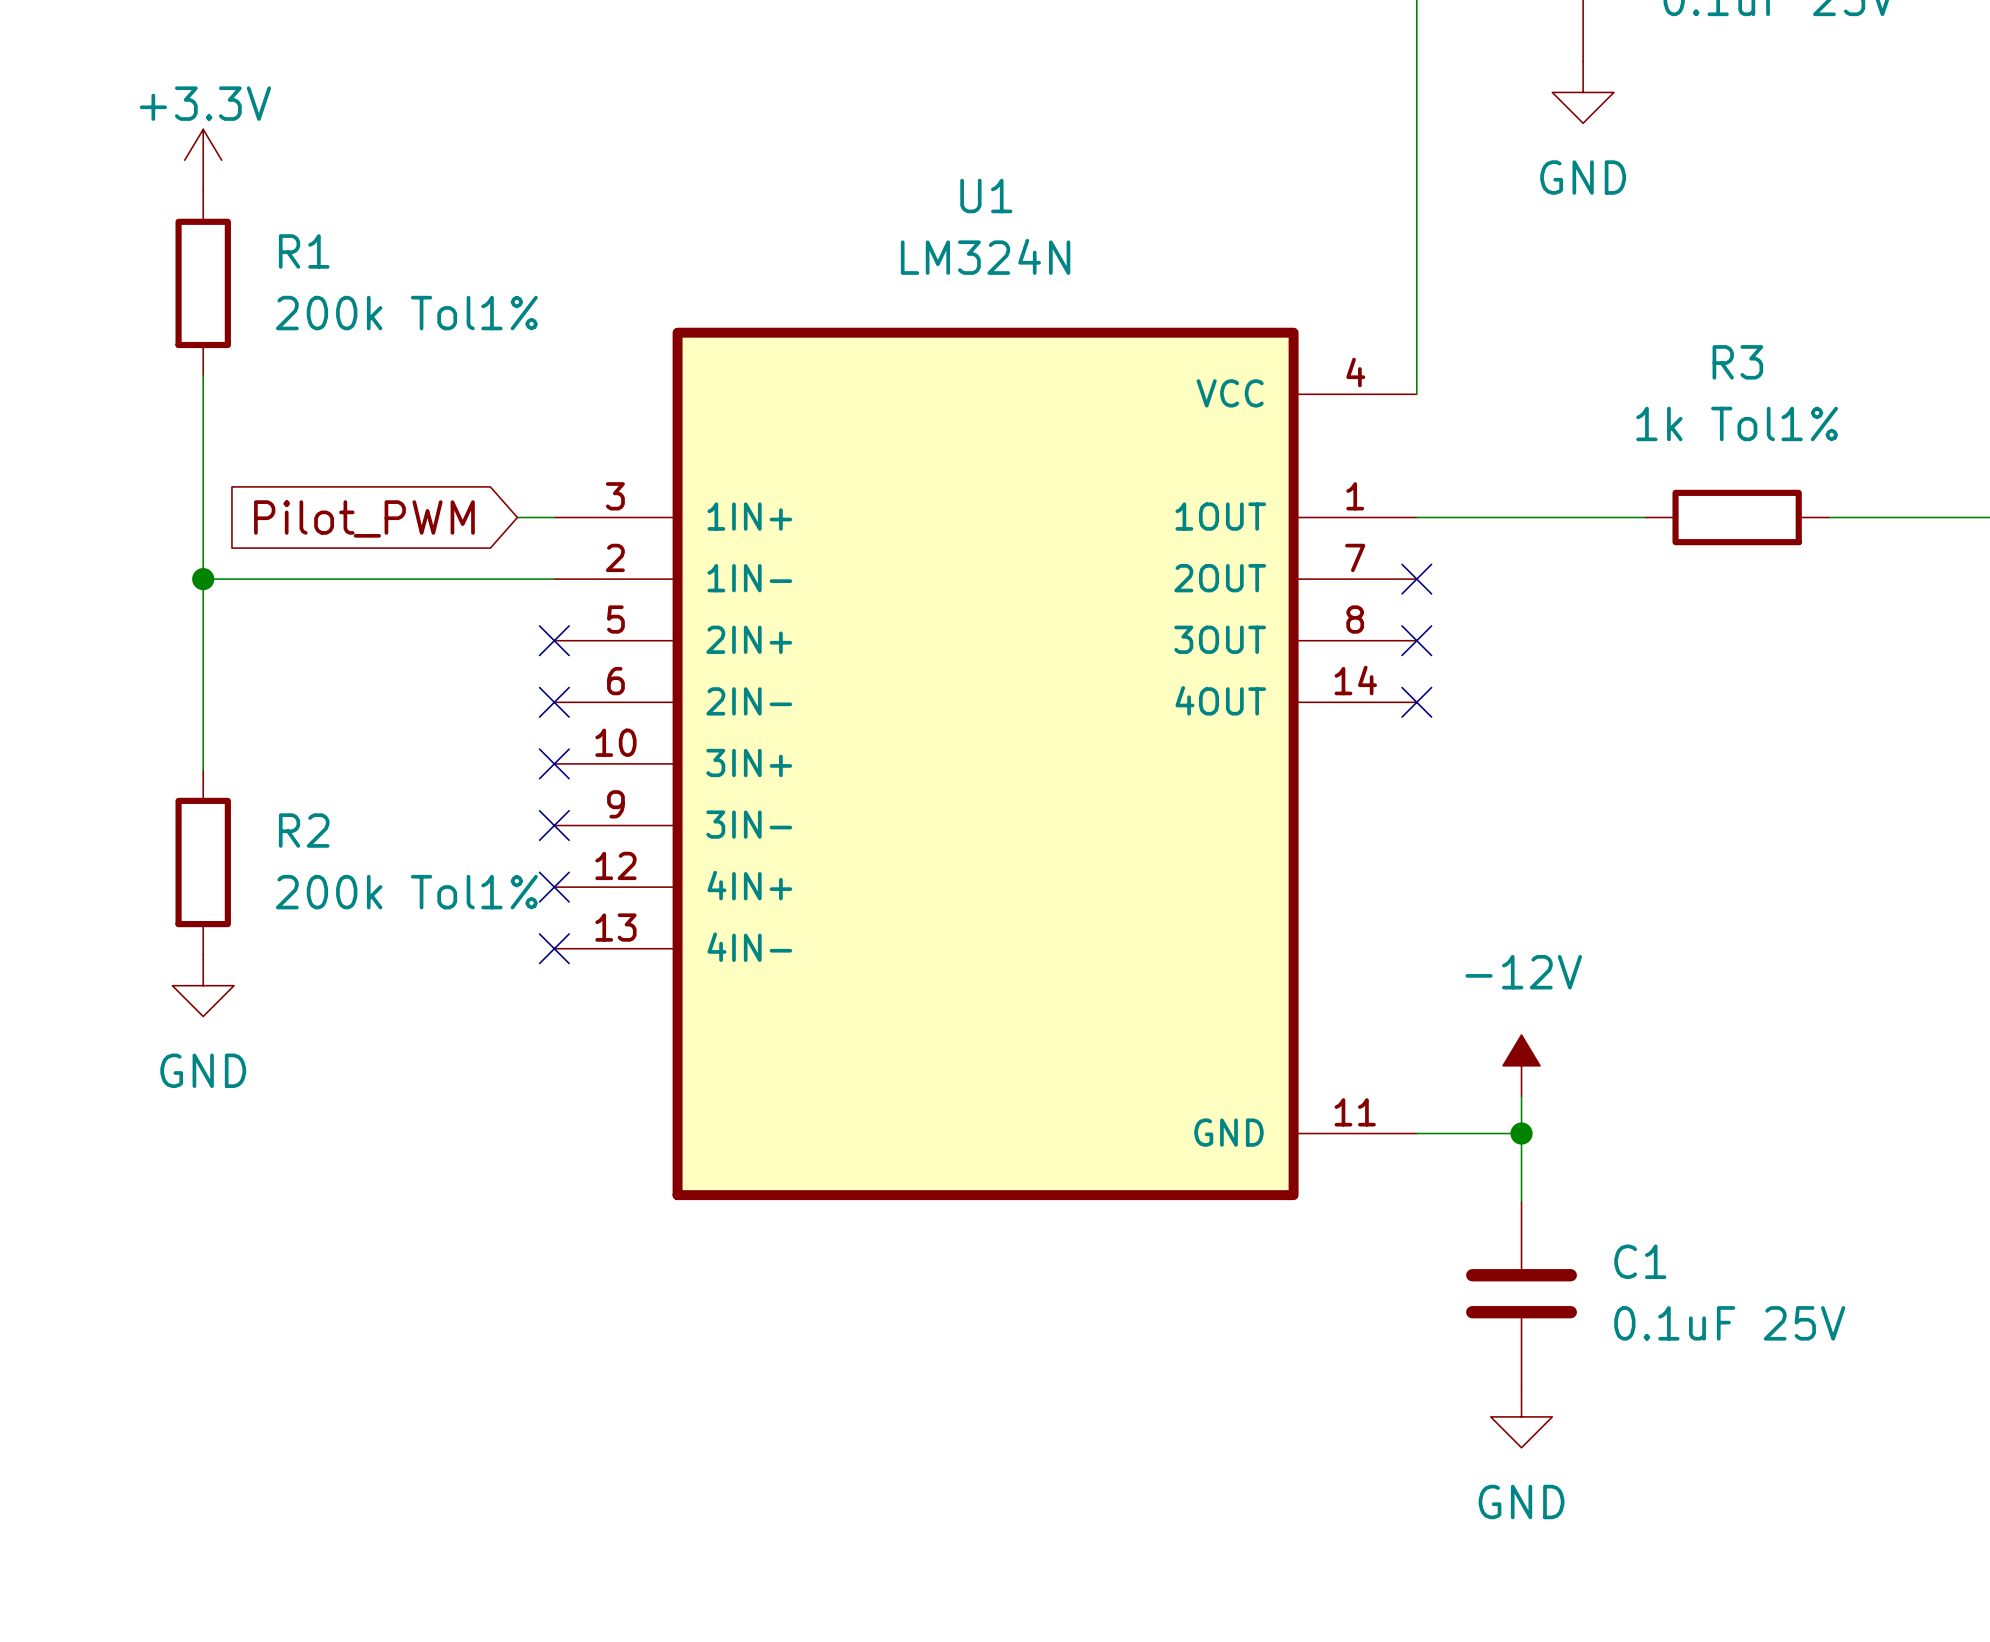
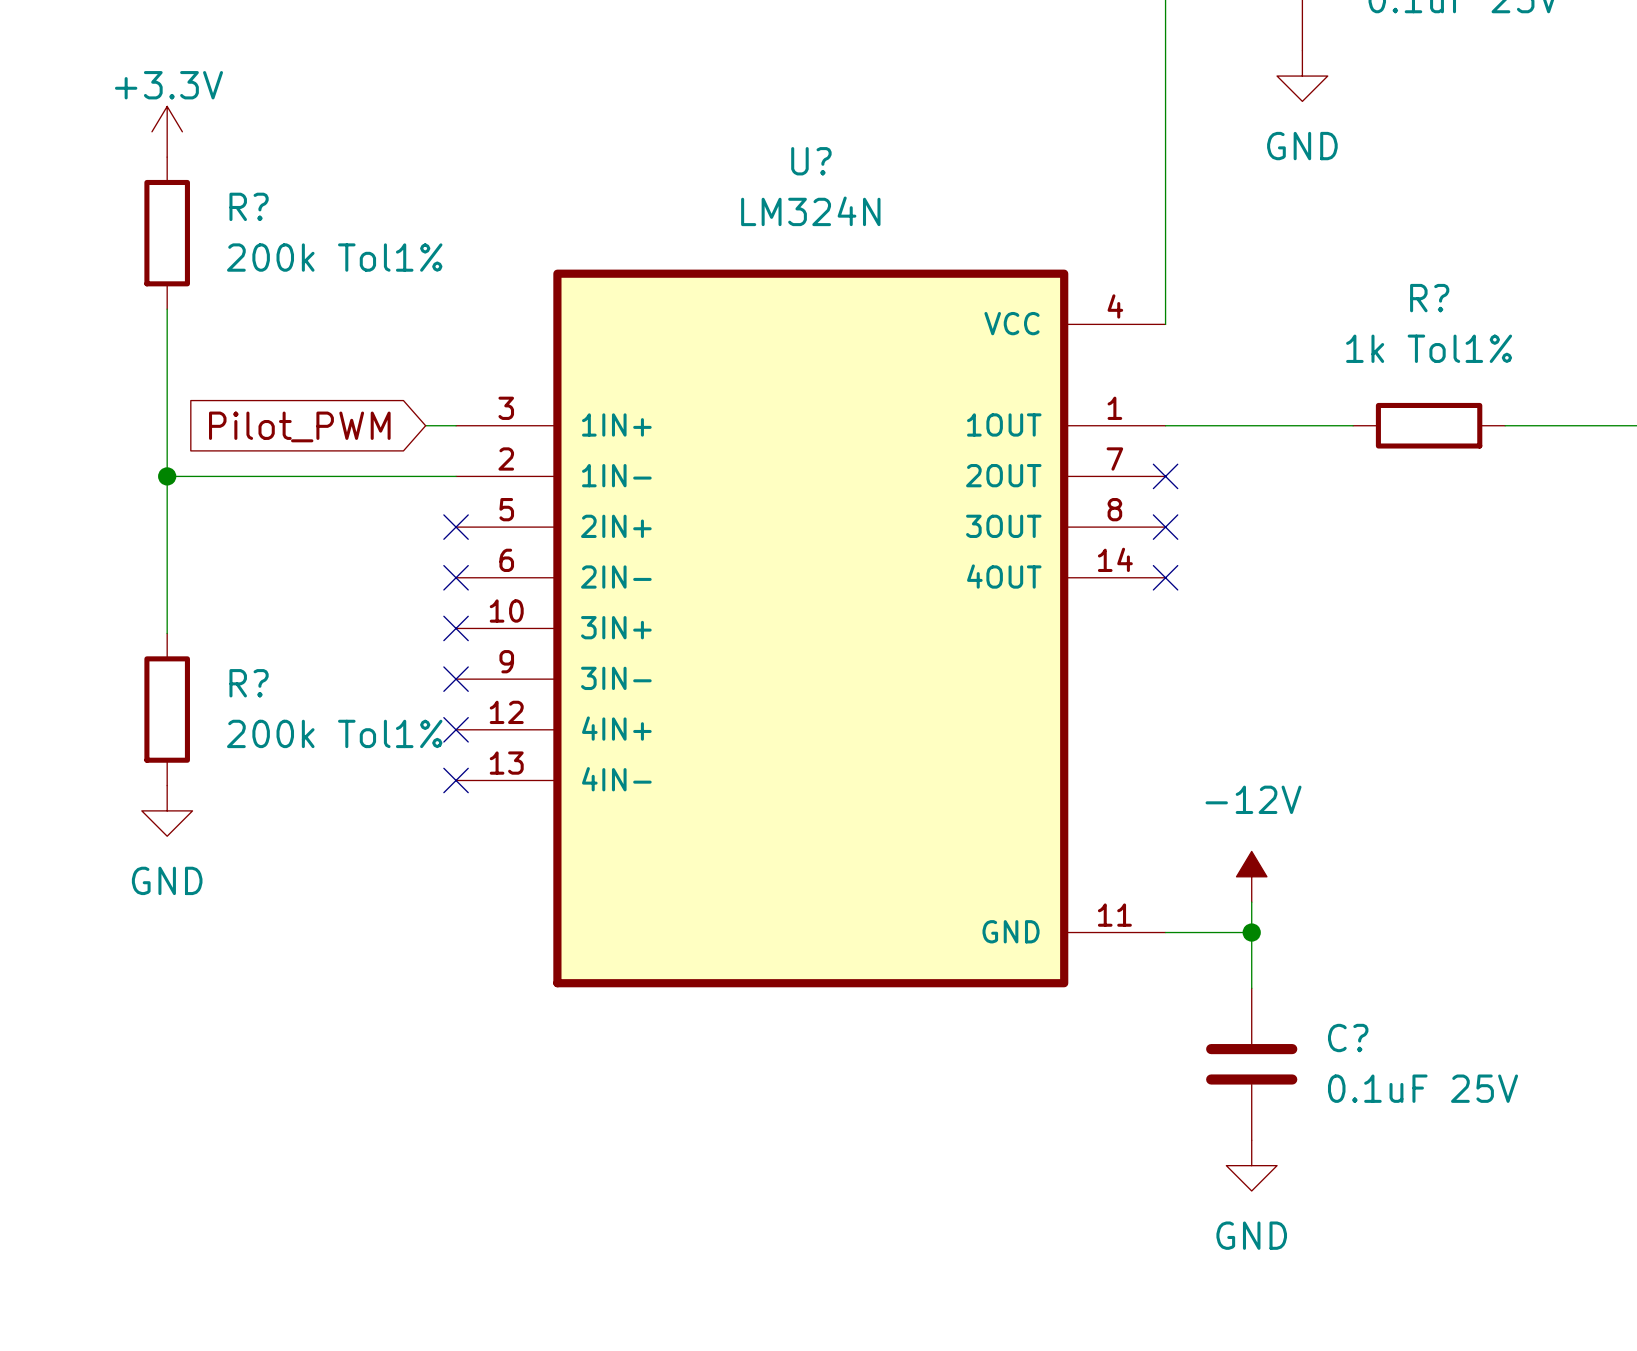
U1 name: U1 (986, 196) -> U? (811, 161)
R1 name: R1 (304, 251) -> R? (249, 206)
R3 name: R3 (1737, 362) -> R? (1429, 298)
R2 name: R2 (304, 830) -> R? (249, 683)
C1 name: C1 (1640, 1261) -> C? (1348, 1038)

